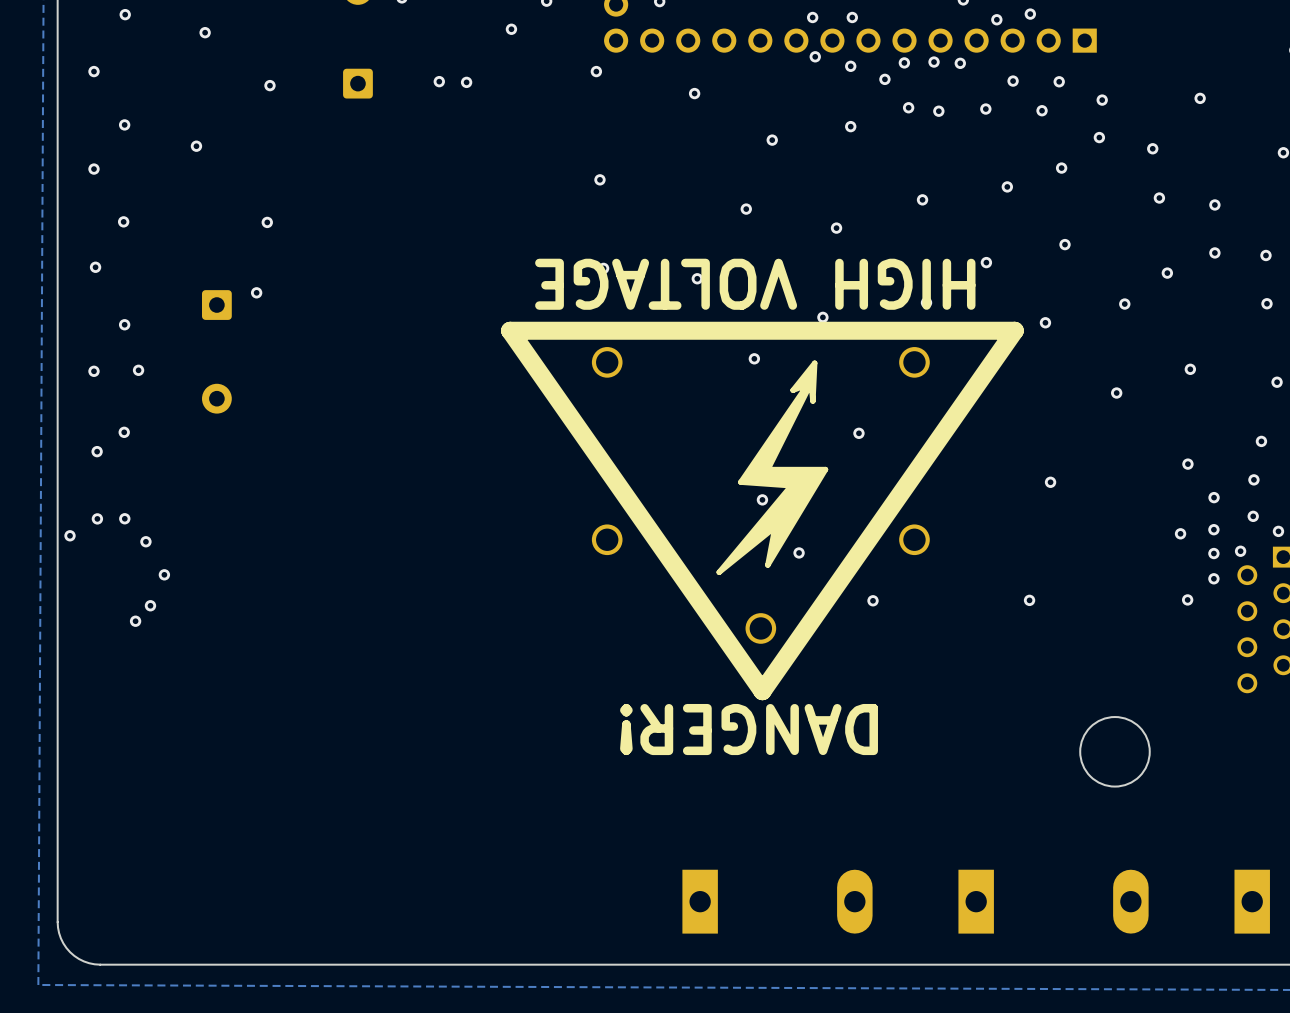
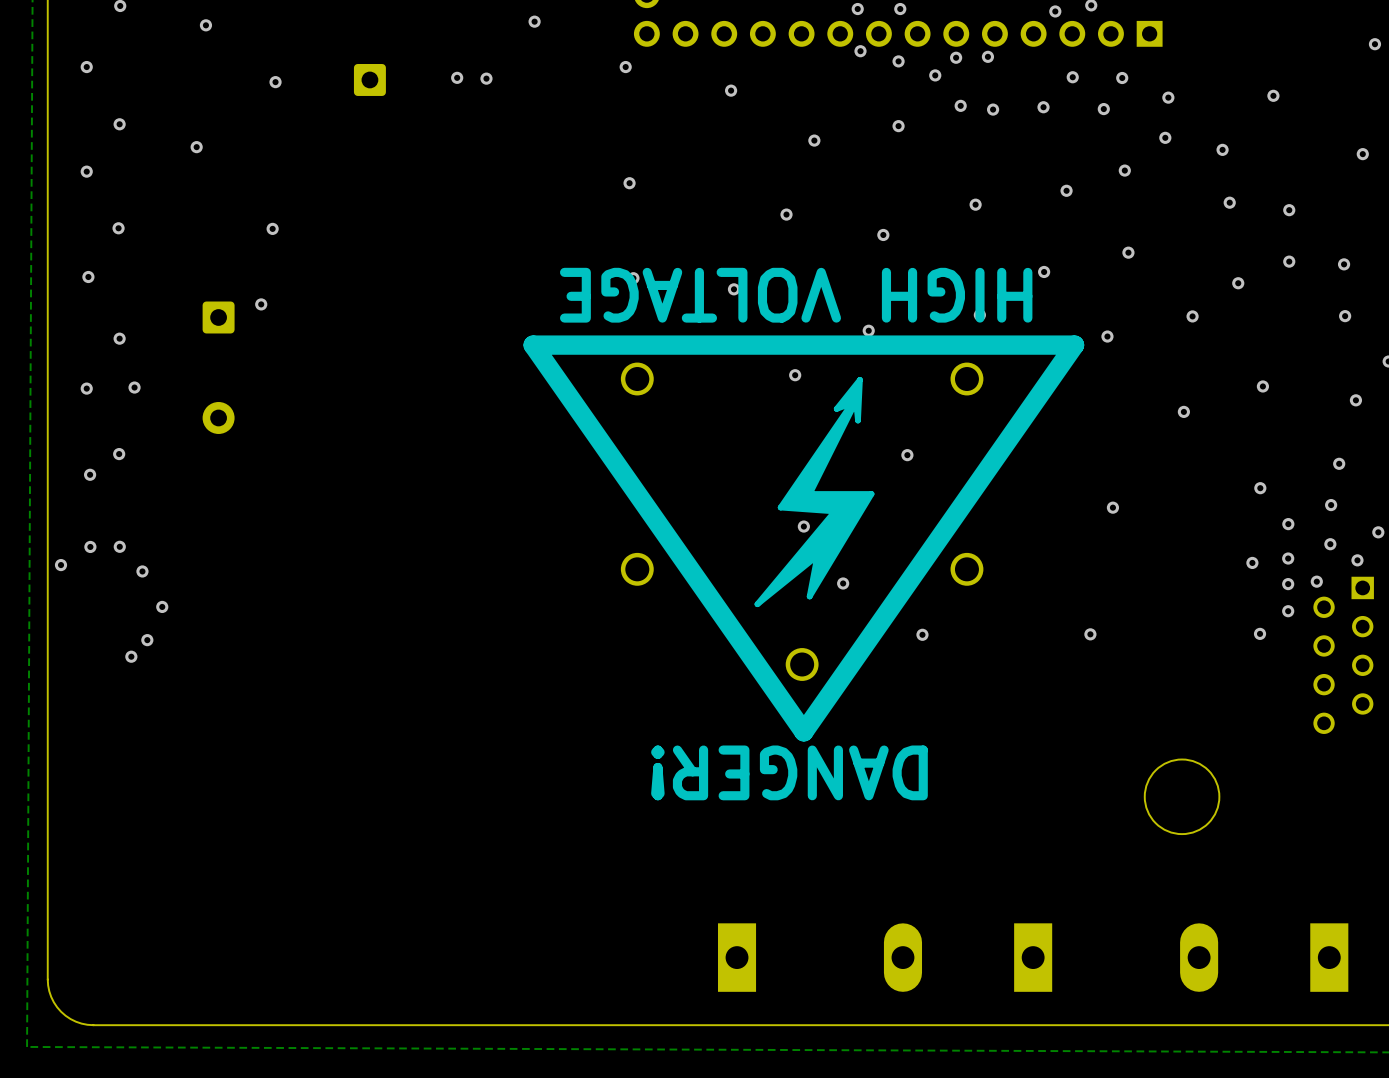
via: (960, 63) -> none

